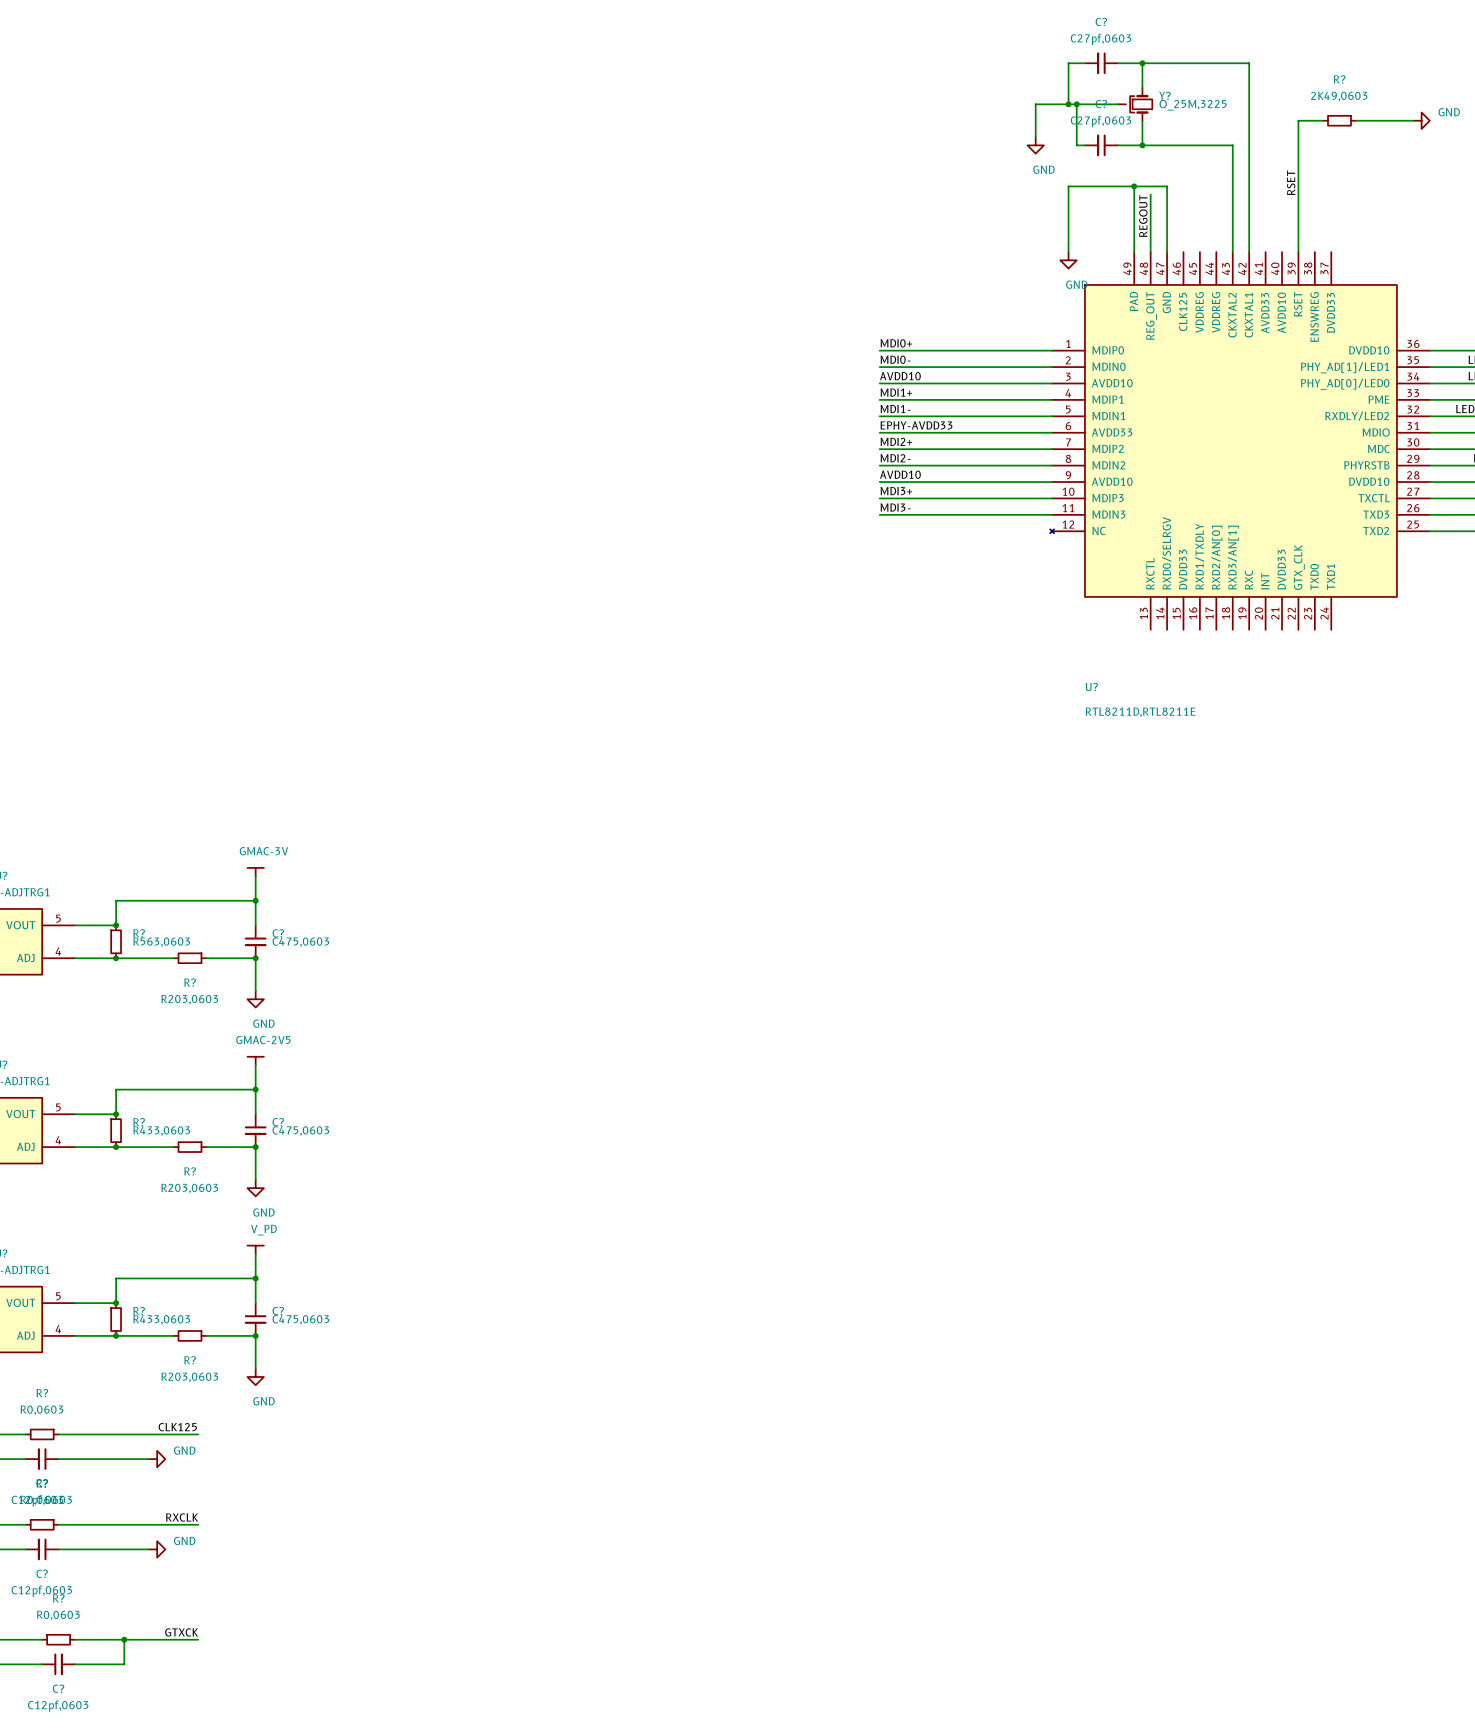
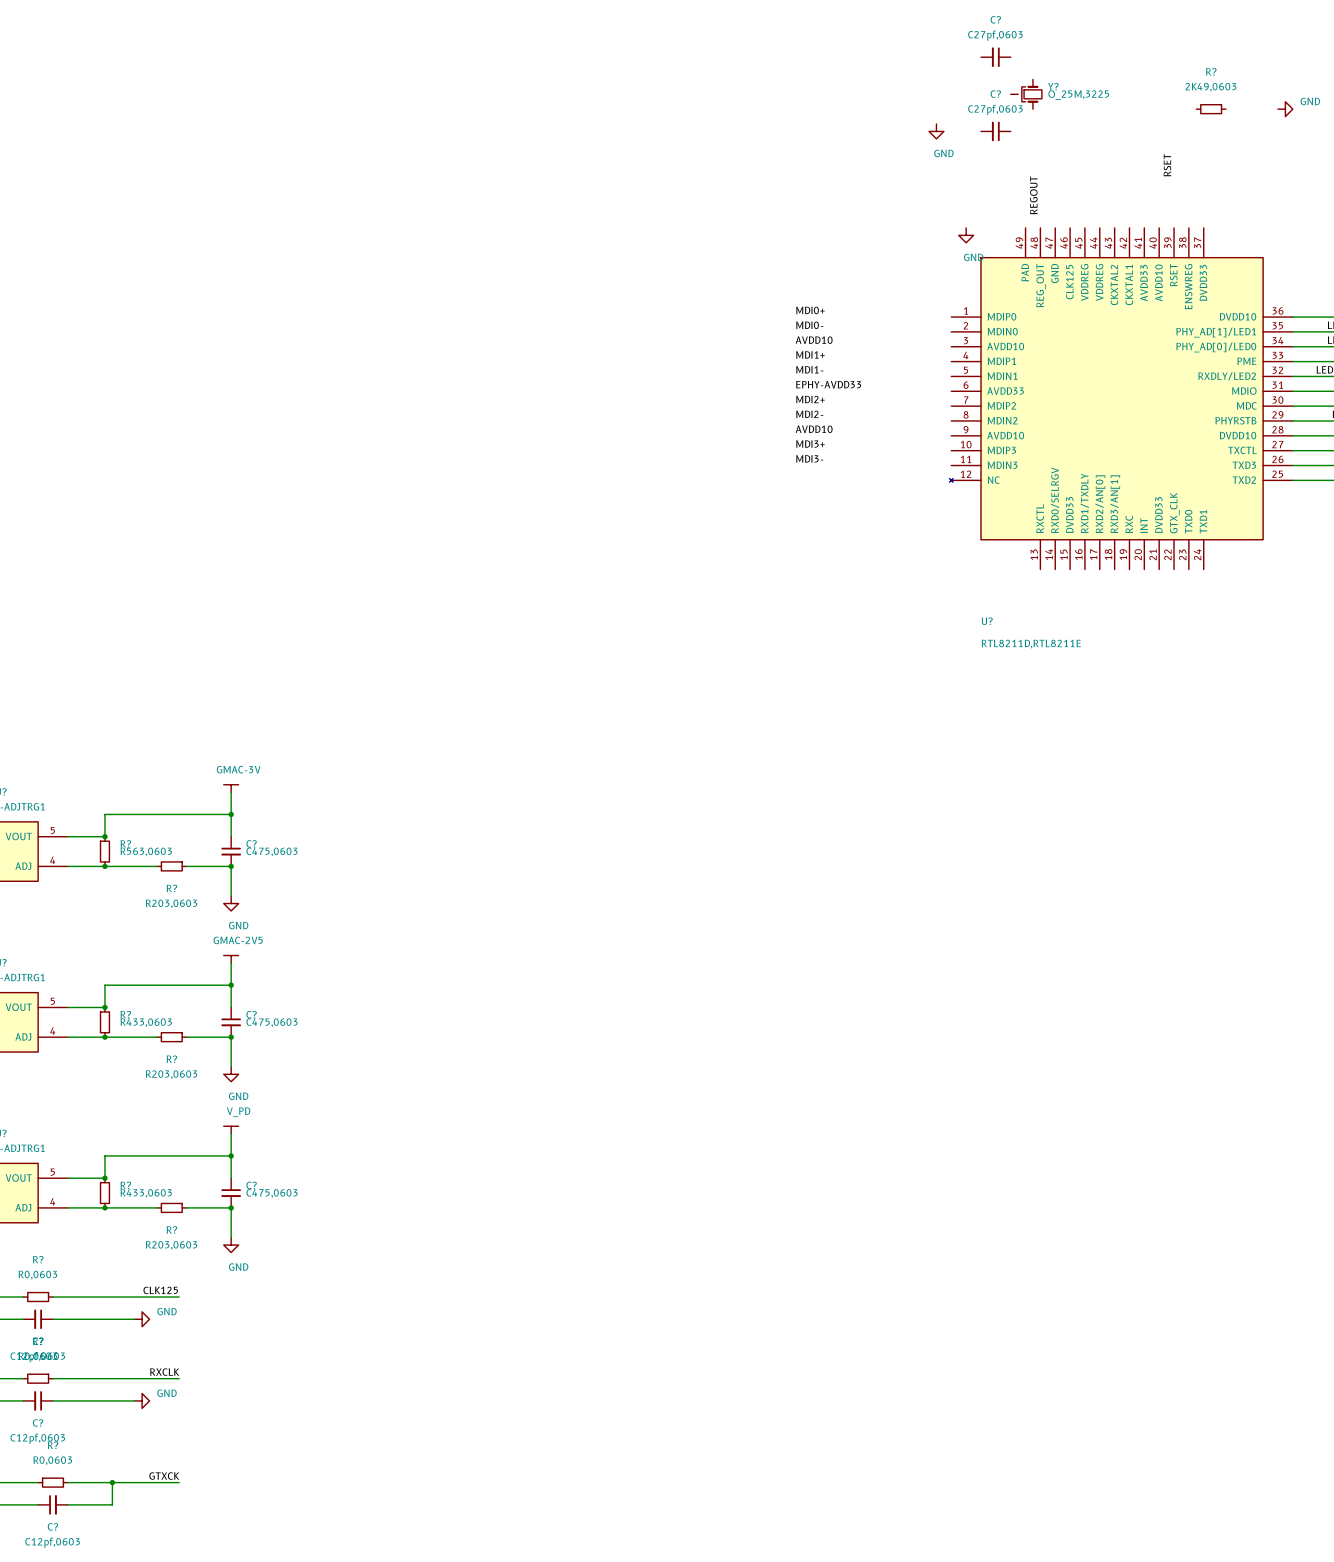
wire: (1084, 63) (1068, 63) (1068, 104) -> none
wire: (1117, 63) (1249, 63) (1249, 252) -> none
wire: (1142, 63) (1142, 87) -> none
junction: (1142, 63) -> none
junction: (1068, 104) -> none
wire: (1076, 104) (1076, 145) (1084, 145) -> none
junction: (1076, 104) -> none
wire: (1117, 104) (1035, 104) (1035, 137) -> none
wire: (1142, 120) (1142, 145) -> none
wire: (1323, 120) (1298, 120) (1298, 252) -> none
wire: (1355, 120) (1413, 120) -> none
wire: (1117, 145) (1232, 145) (1232, 252) -> none
junction: (1142, 145) -> none
wire: (1134, 186) (1134, 252) -> none
junction: (1134, 186) -> none
wire: (1150, 194) (1150, 252) -> none
wire: (1068, 252) (1068, 186) (1167, 186) (1167, 252) -> none
wire: (879, 350) (1052, 350) -> none
wire: (879, 367) (1052, 367) -> none
wire: (879, 383) (1052, 383) -> none
wire: (879, 399) (1052, 399) -> none
wire: (879, 416) (1052, 416) -> none
wire: (879, 432) (1052, 432) -> none
wire: (879, 449) (1052, 449) -> none
wire: (879, 465) (1052, 465) -> none
wire: (879, 482) (1052, 482) -> none
wire: (879, 498) (1052, 498) -> none
wire: (879, 514) (1052, 514) -> none

